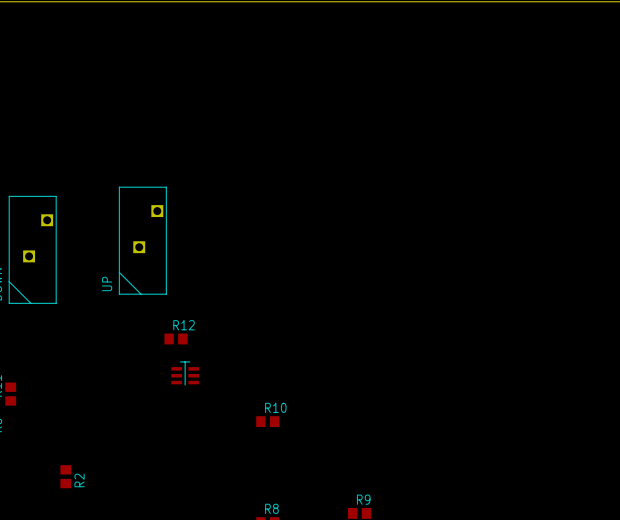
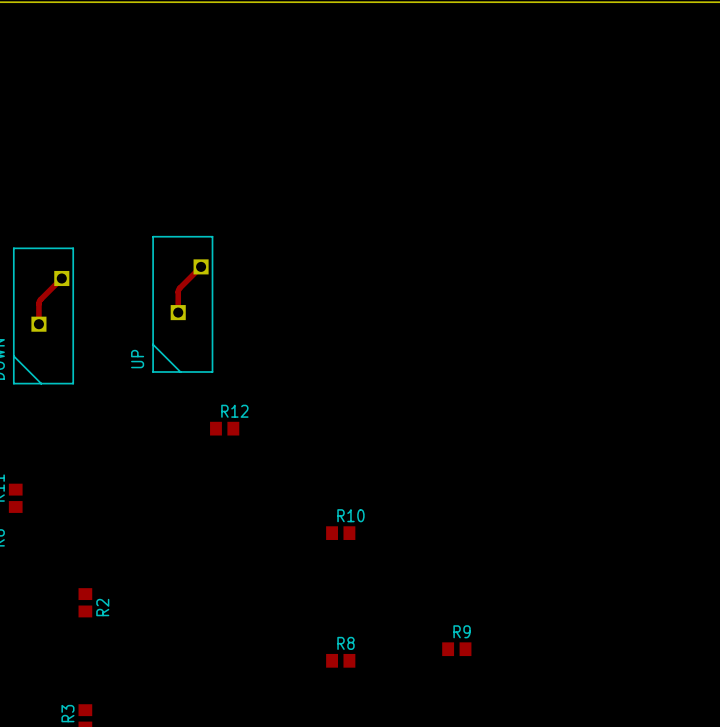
top track: none -> (201, 266) (179, 289) (178, 312)
top track: none -> (61, 278) (39, 300) (38, 324)
part: (185, 373) -> none

